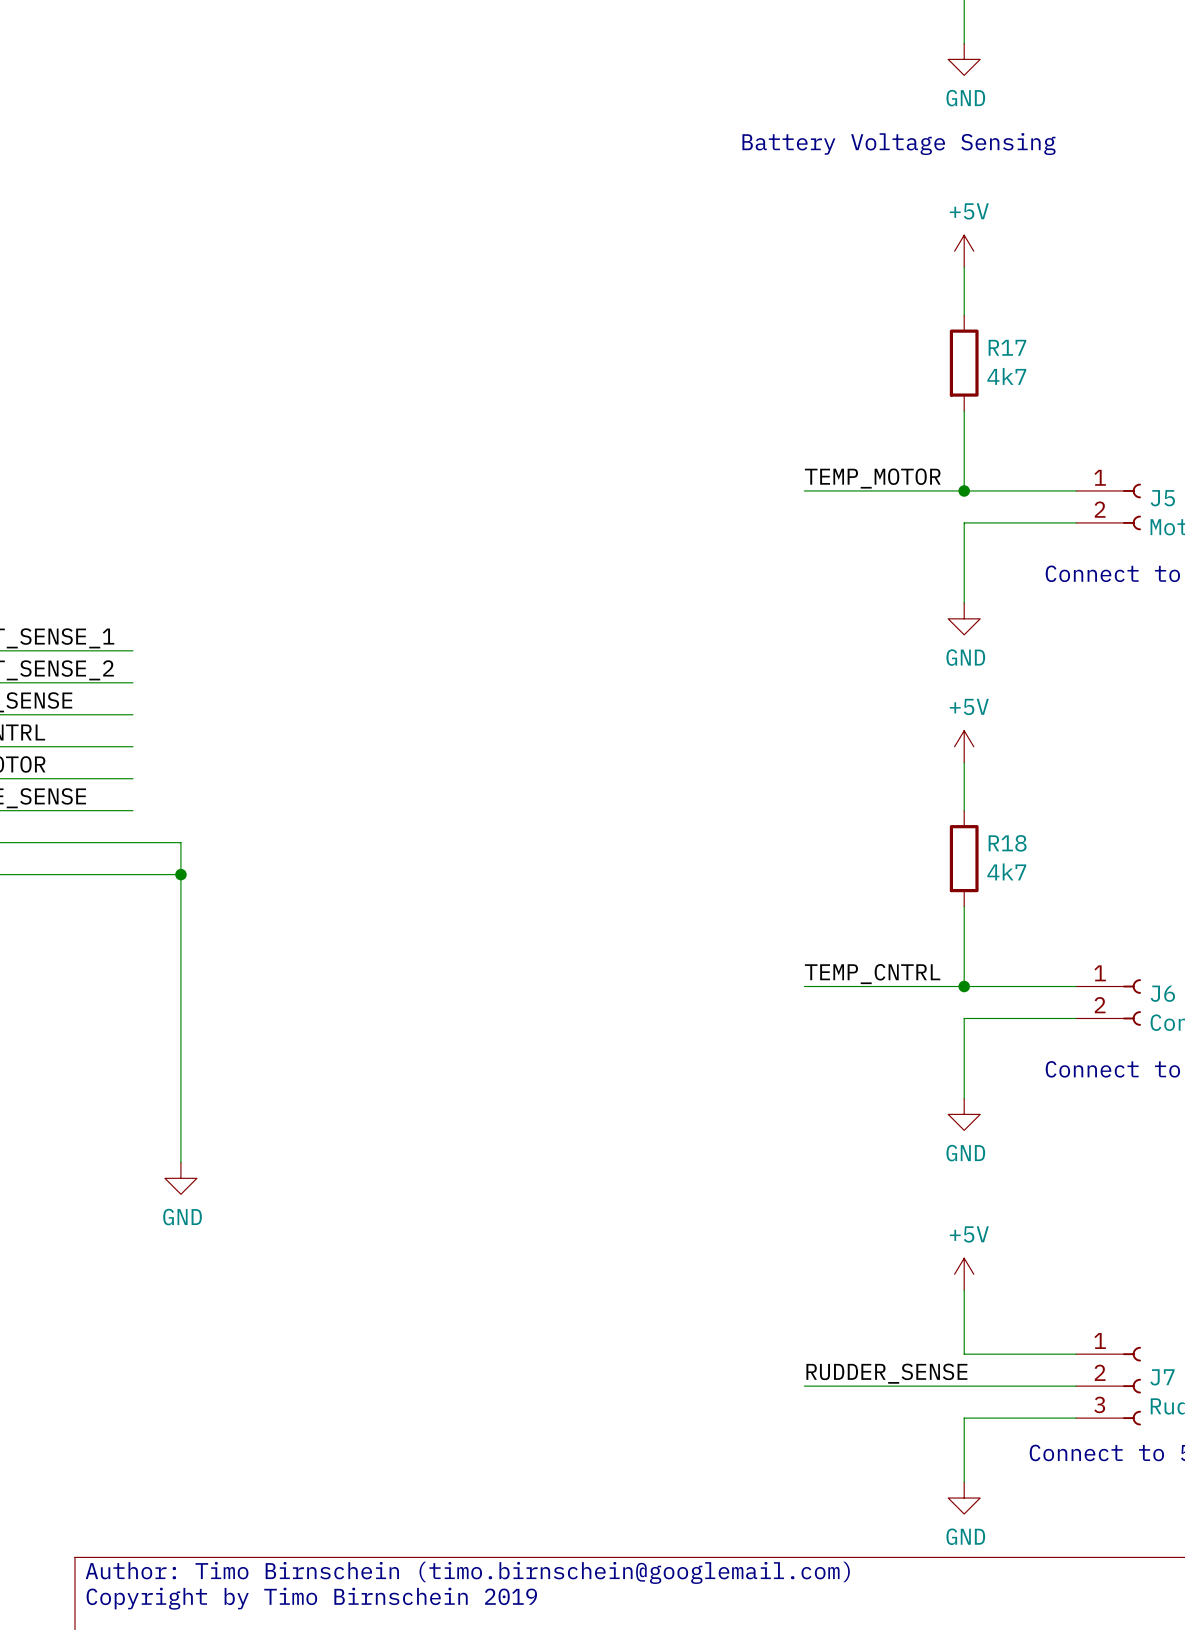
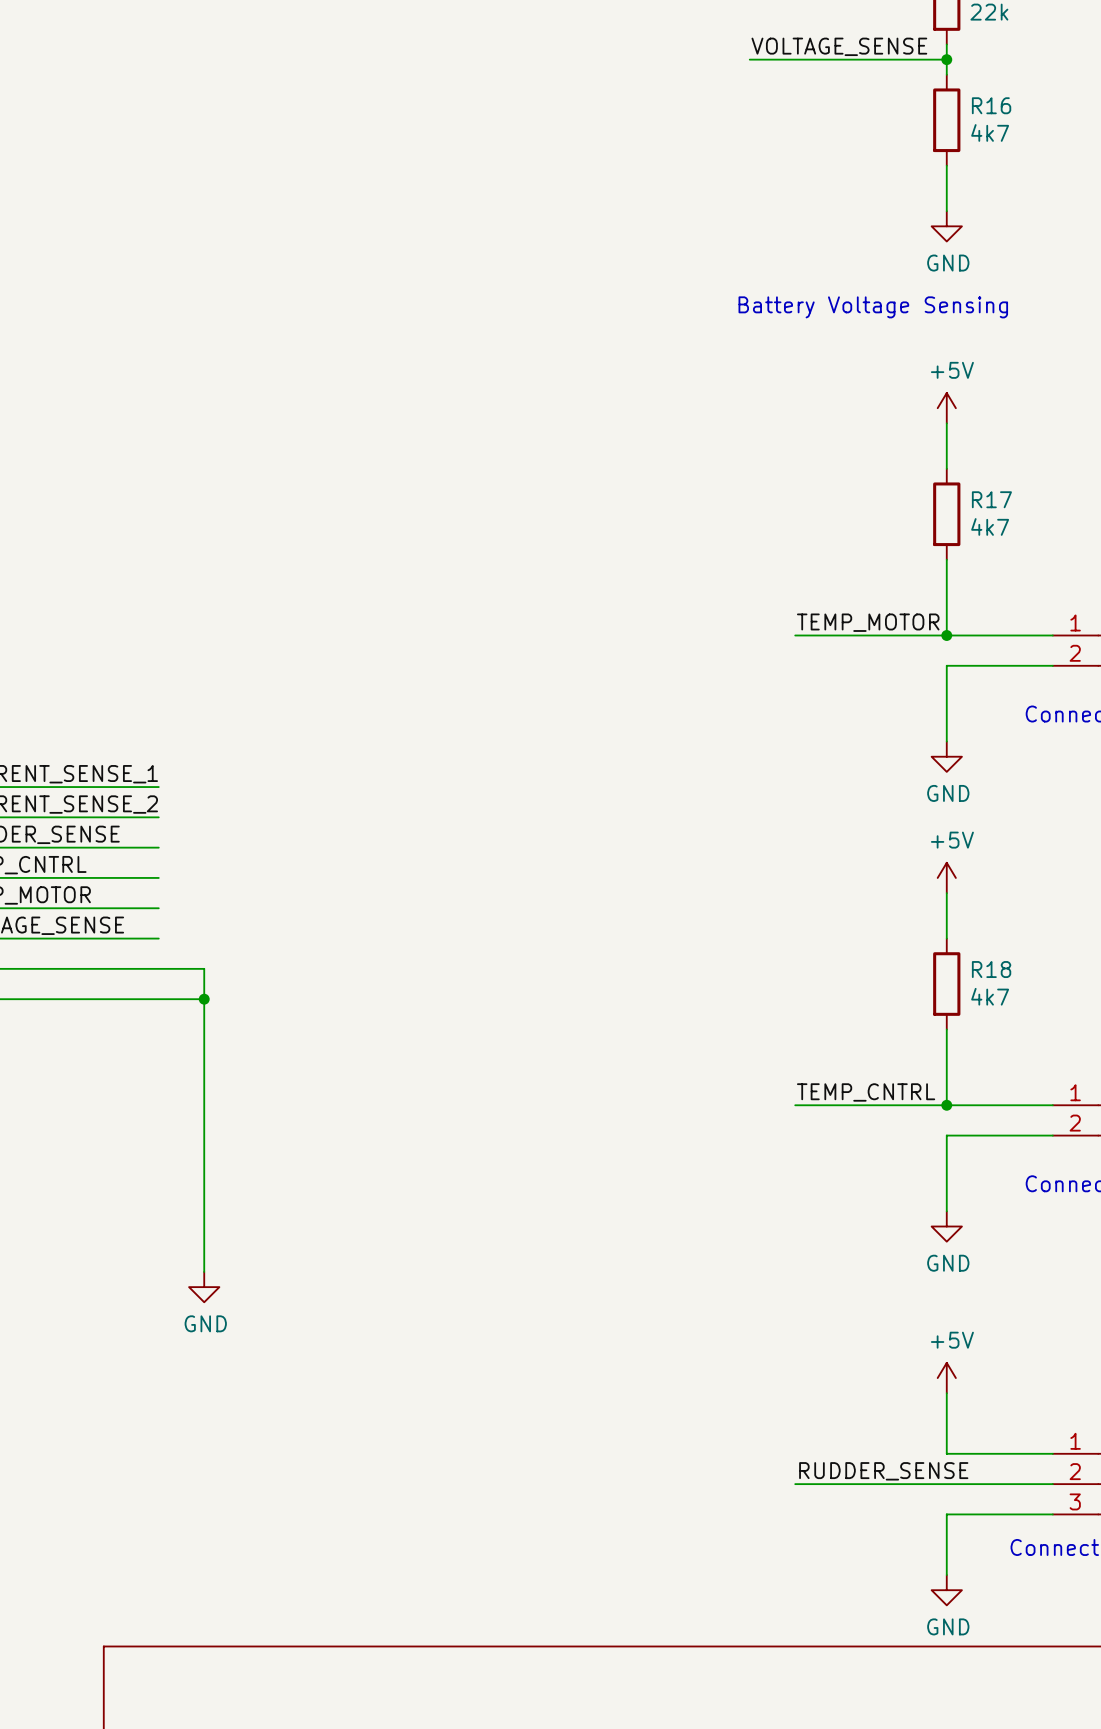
text: Author: Timo Birnschein (timo.birnschein@googlemail.com) (467, 1572) -> none
text: Copyright by Timo Birnschein 2019 (311, 1598) -> none

